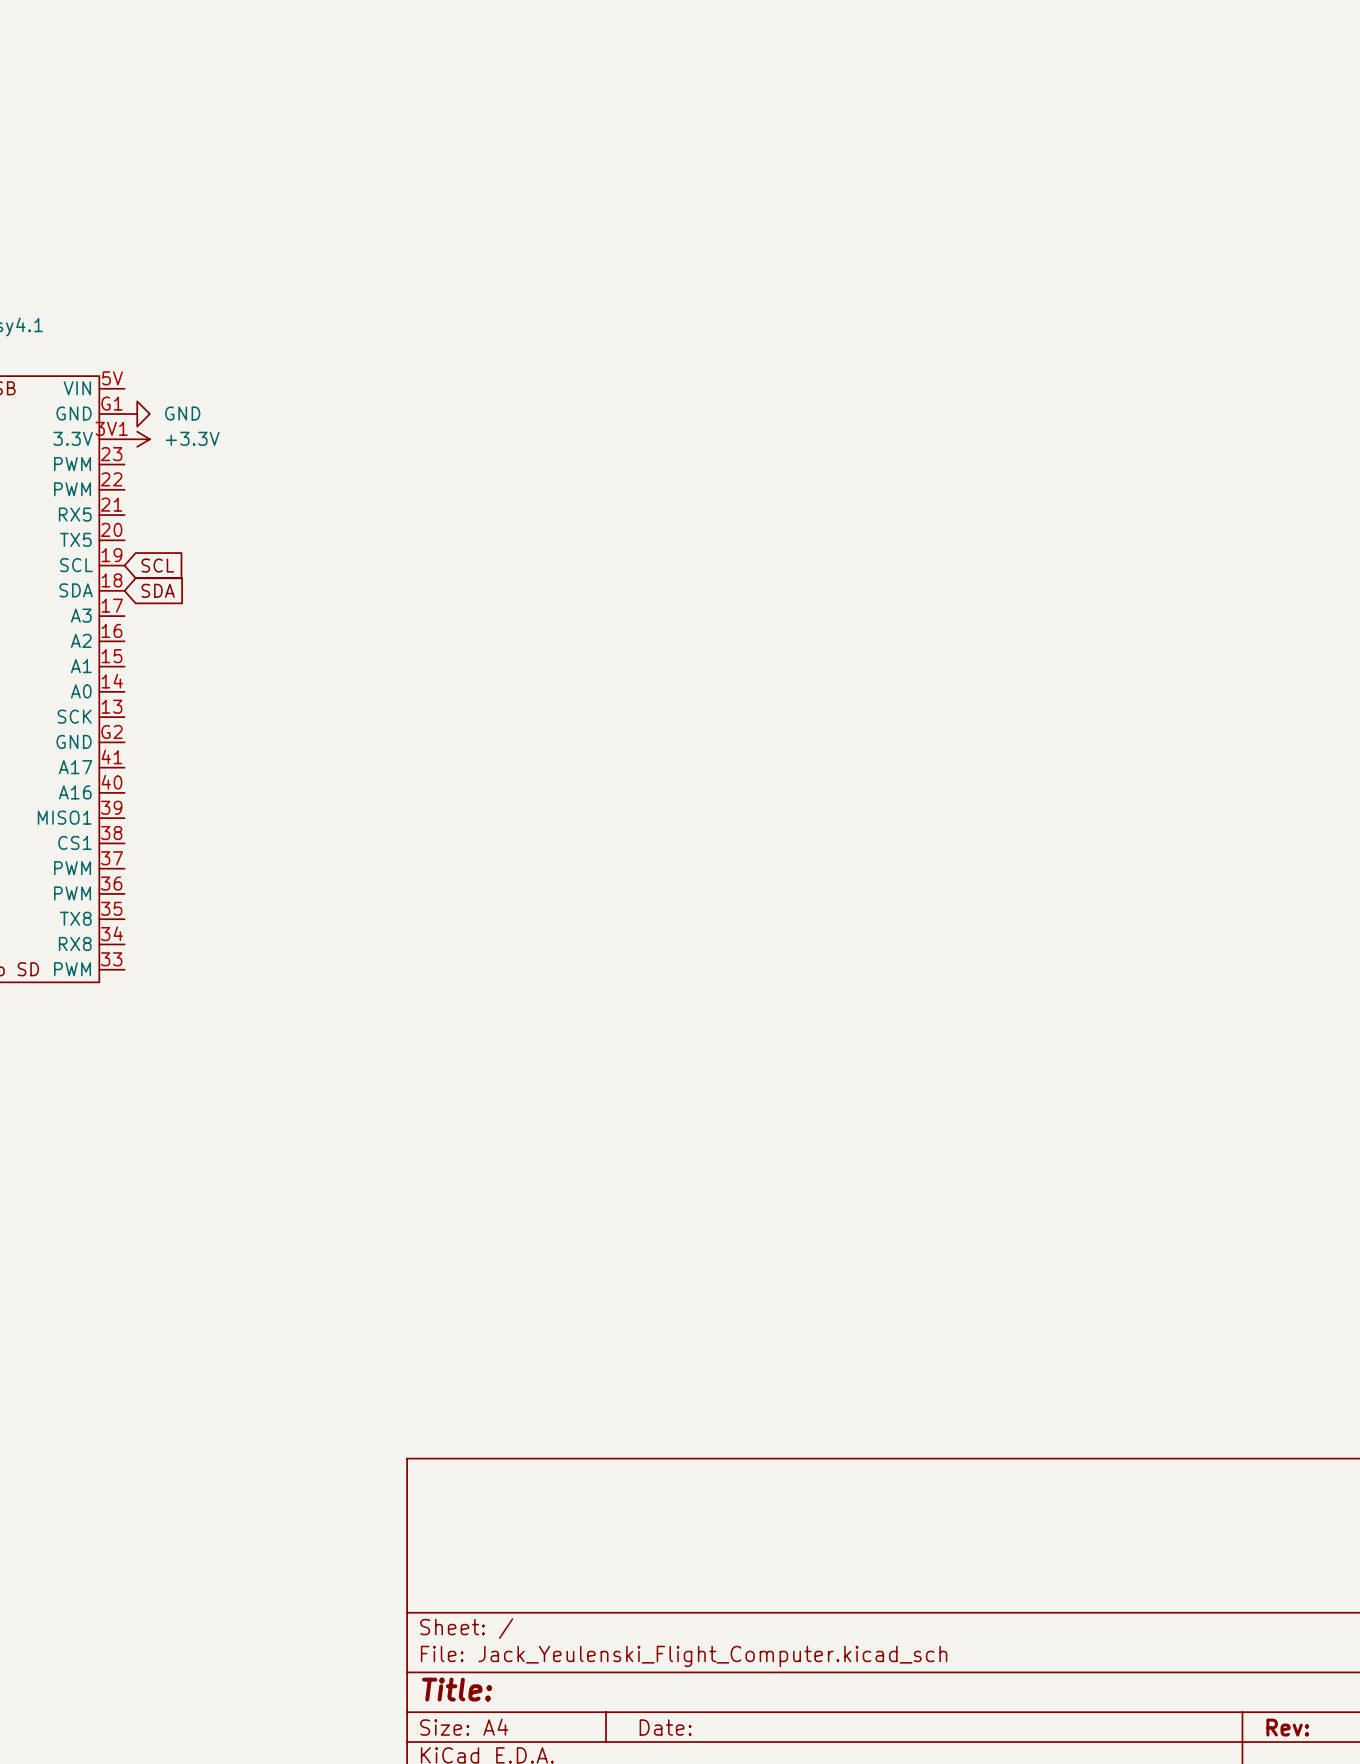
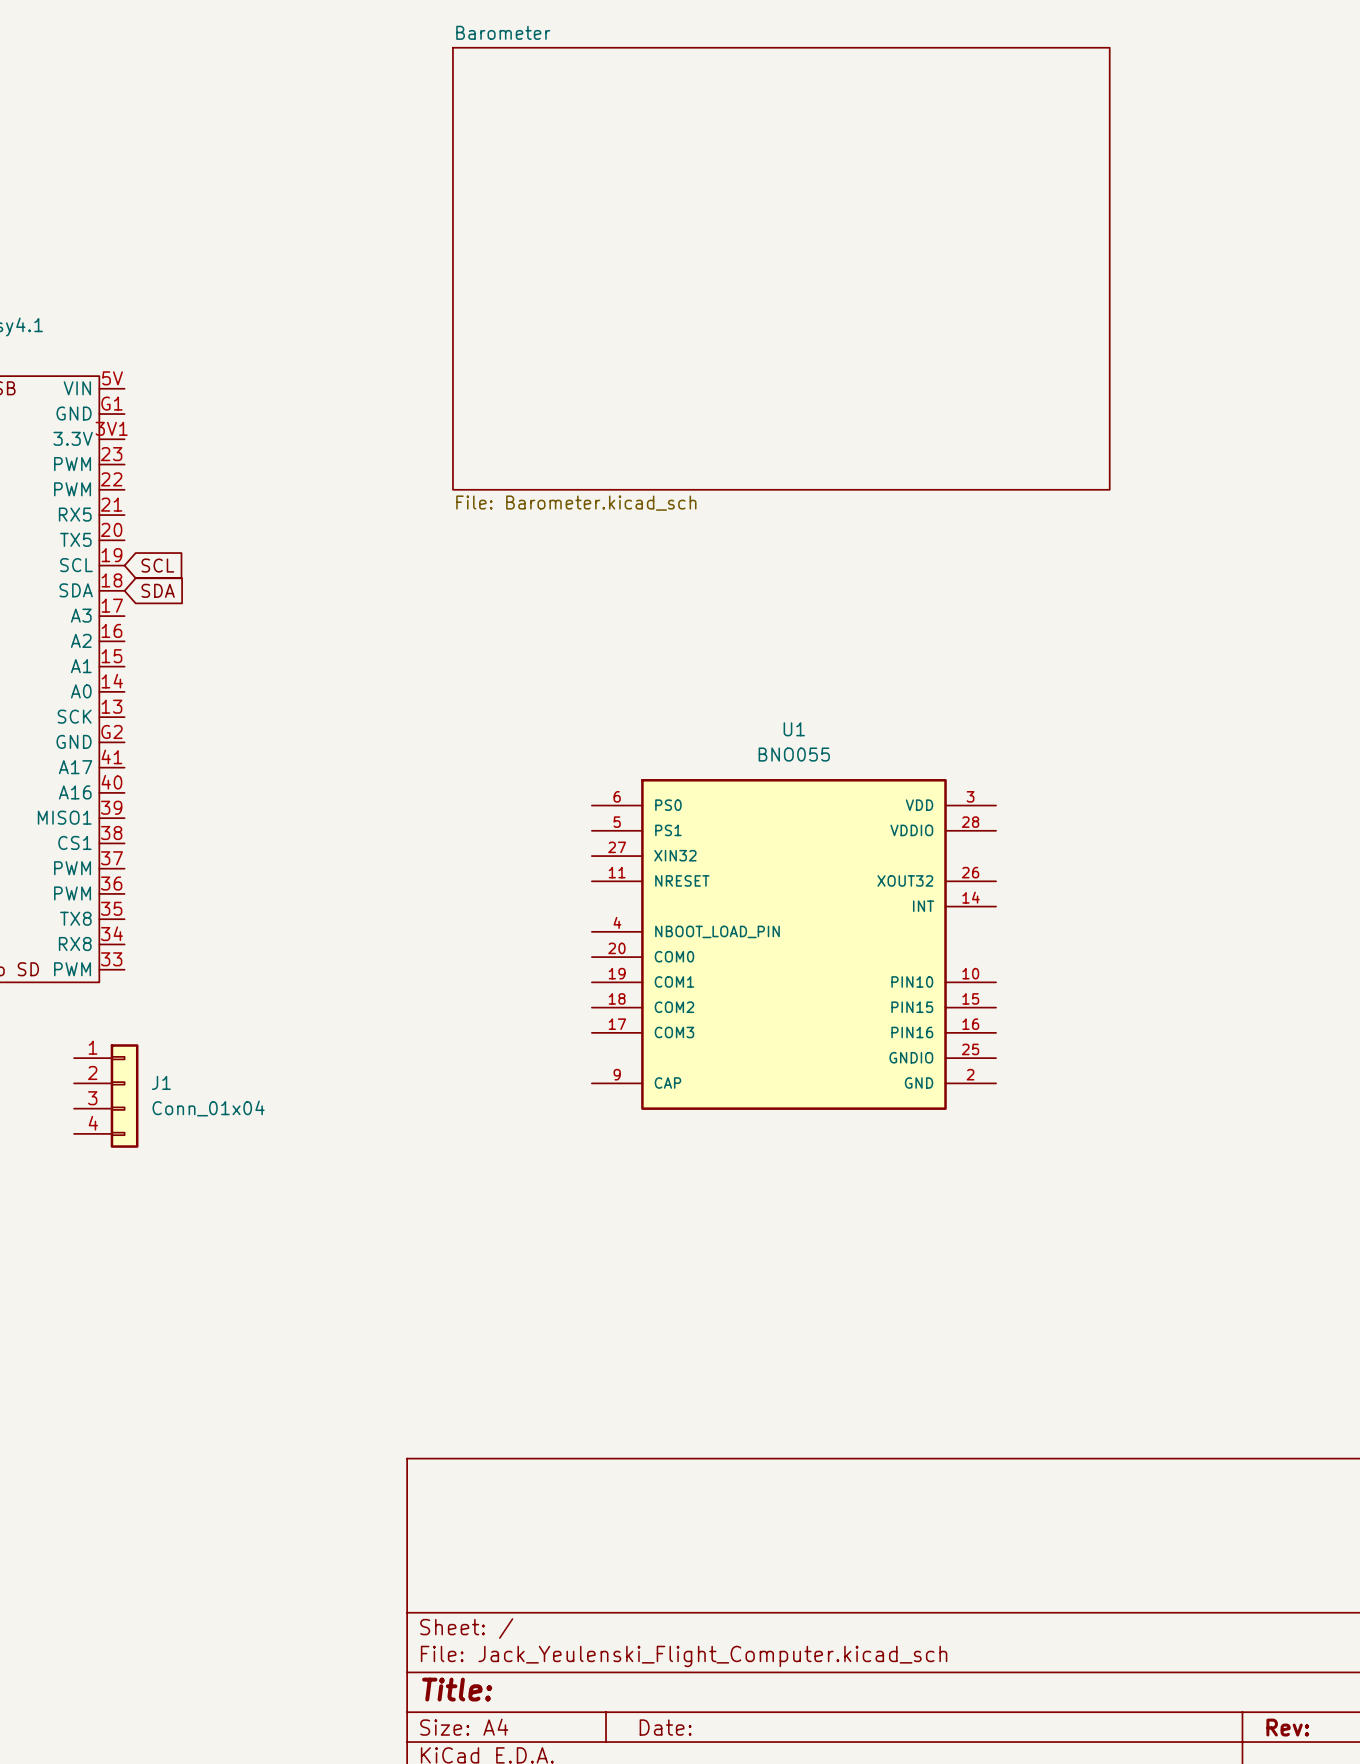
sheet Barometer: none -> File: Barometer.kicad_sch (781, 268)
power symbol: GND (137, 414) -> none
power symbol: +3.3V (137, 439) -> none
U1: none -> BNO055 (793, 944)
J1: none -> Conn_01x04 (106, 1096)

